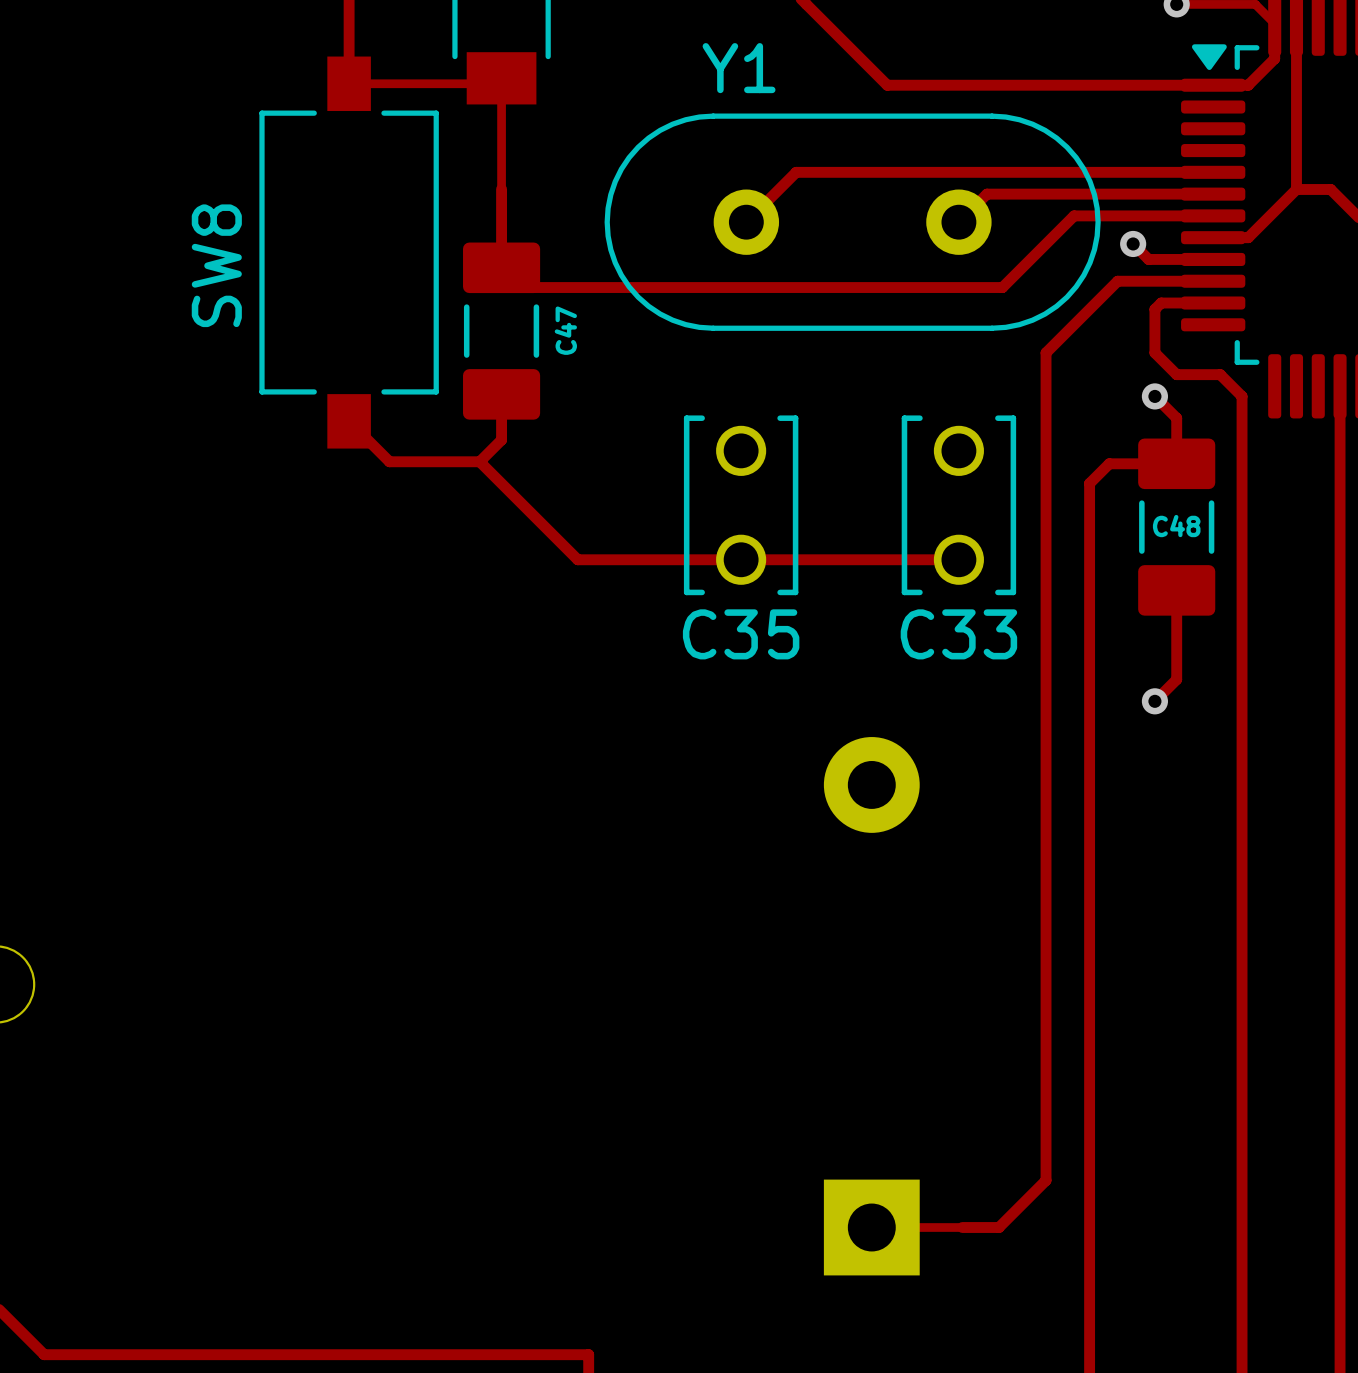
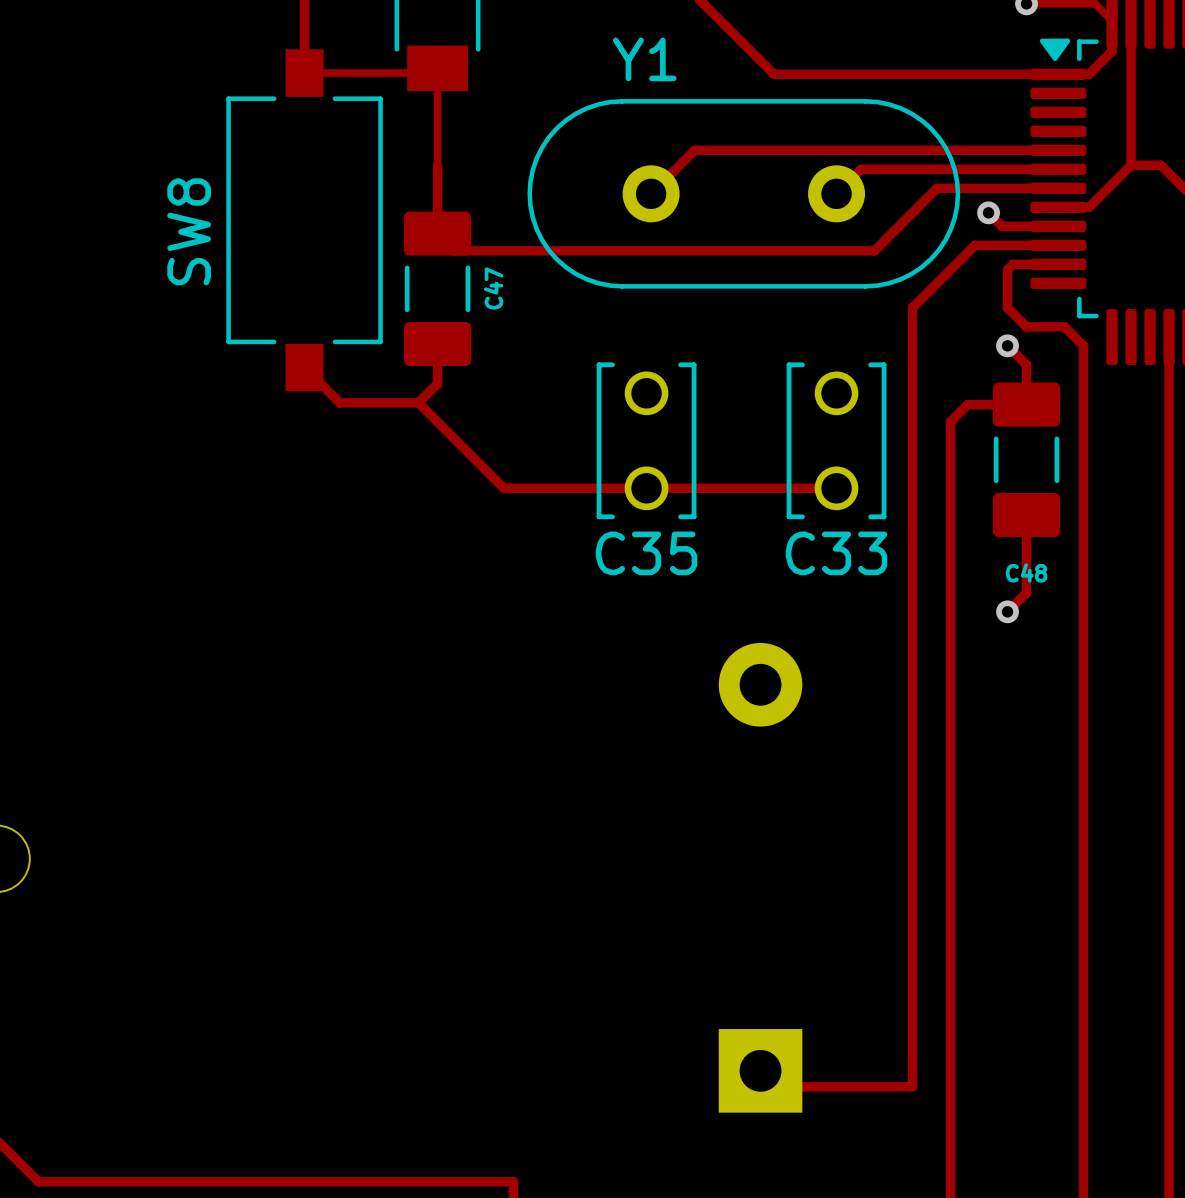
C48 name position: C48 (1176, 526) -> C48 (1026, 572)
track: (1046, 1180) (998, 1227) (871, 1227) -> (912, 1029) (912, 1086) (753, 1086)

